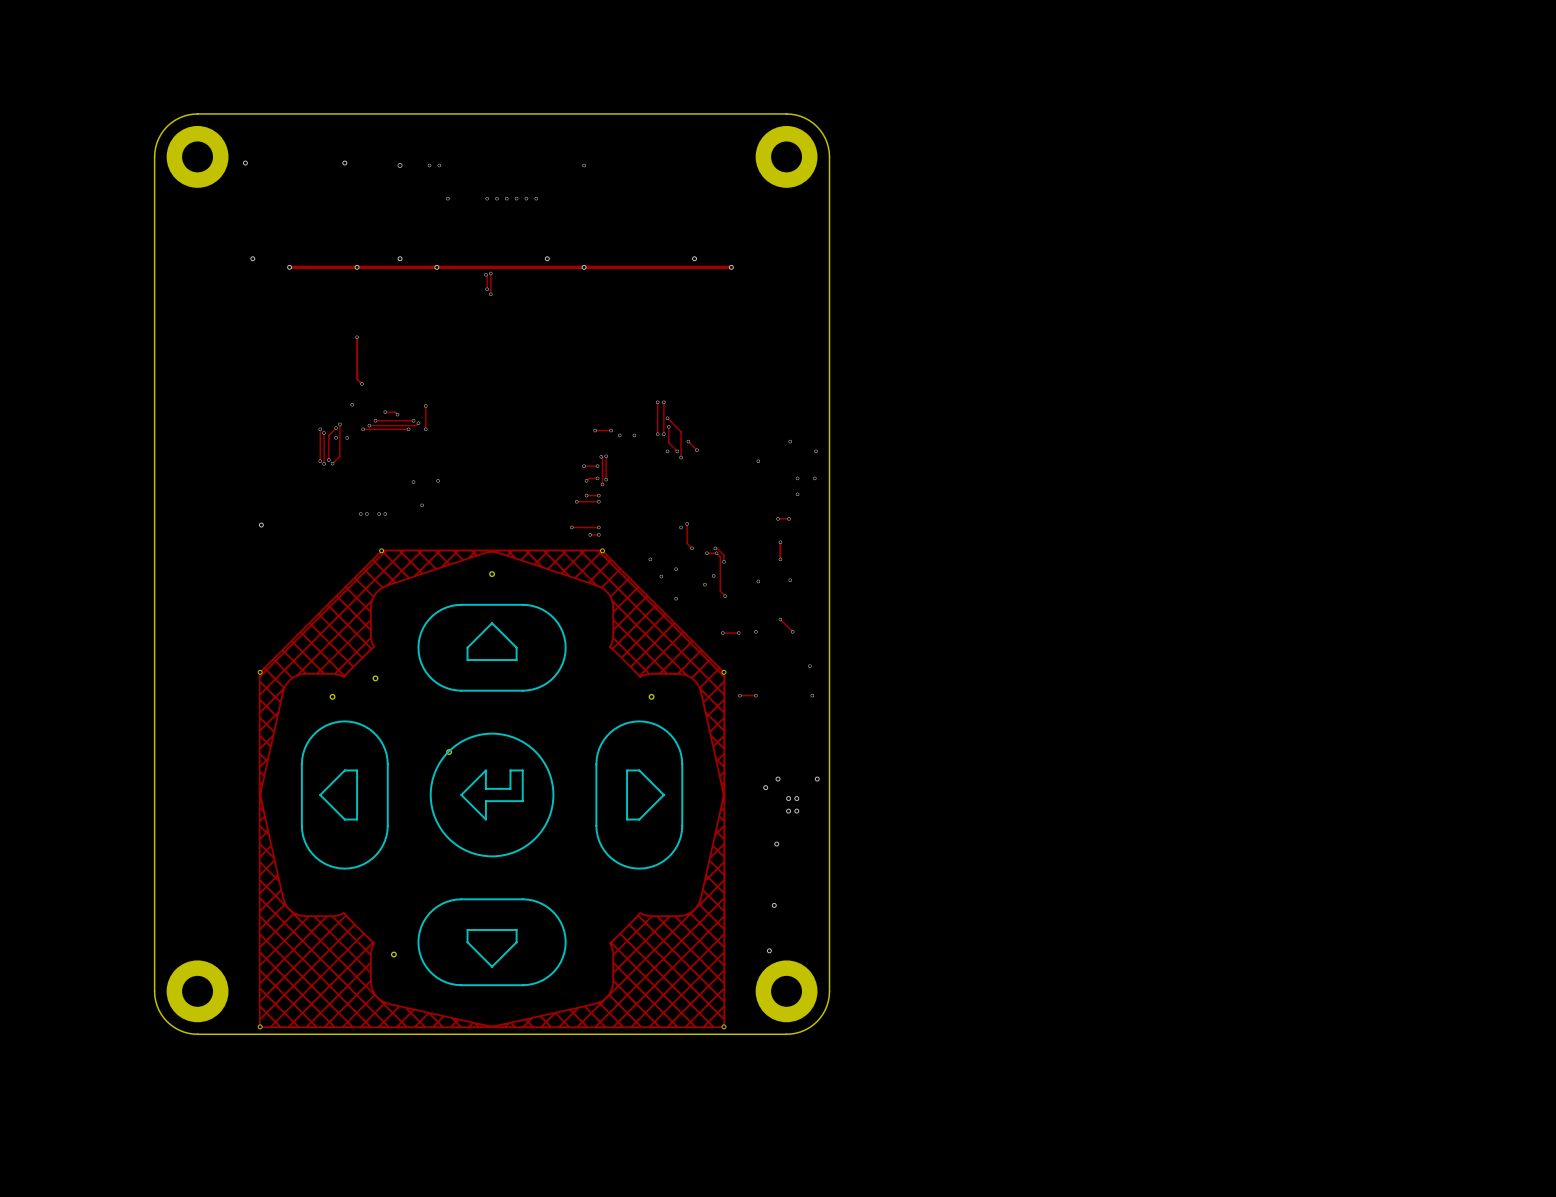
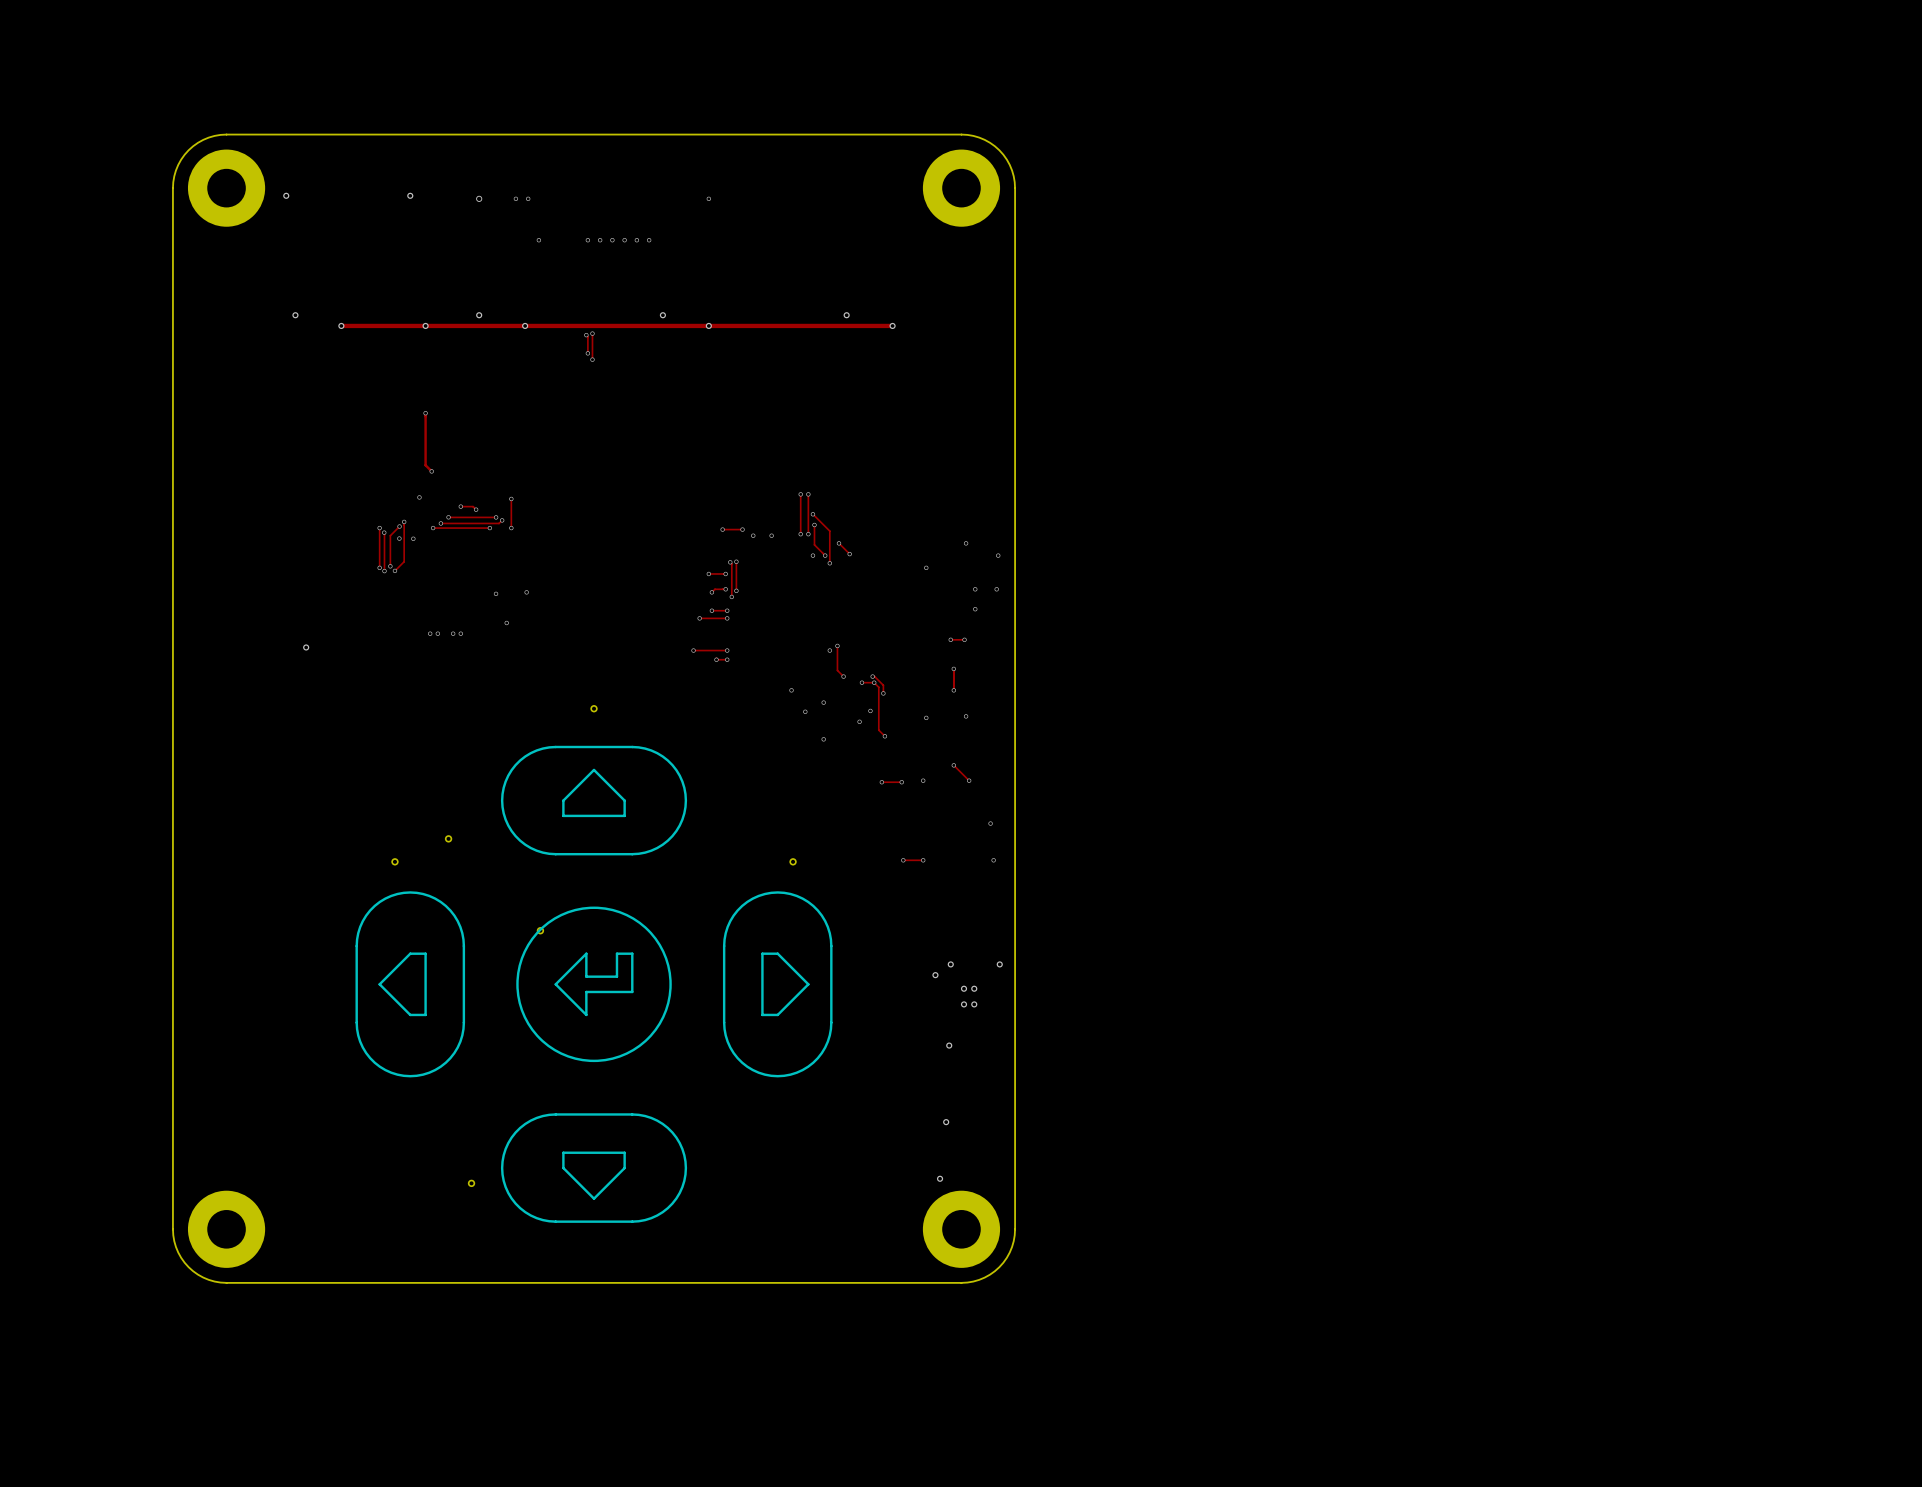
drawing: [258, 549, 726, 1029] -> none
part: (381, 550) -> none
part: (602, 550) -> none
part: (260, 672) -> none
part: (723, 672) -> none
part: (260, 1026) -> none
part: (723, 1026) -> none

